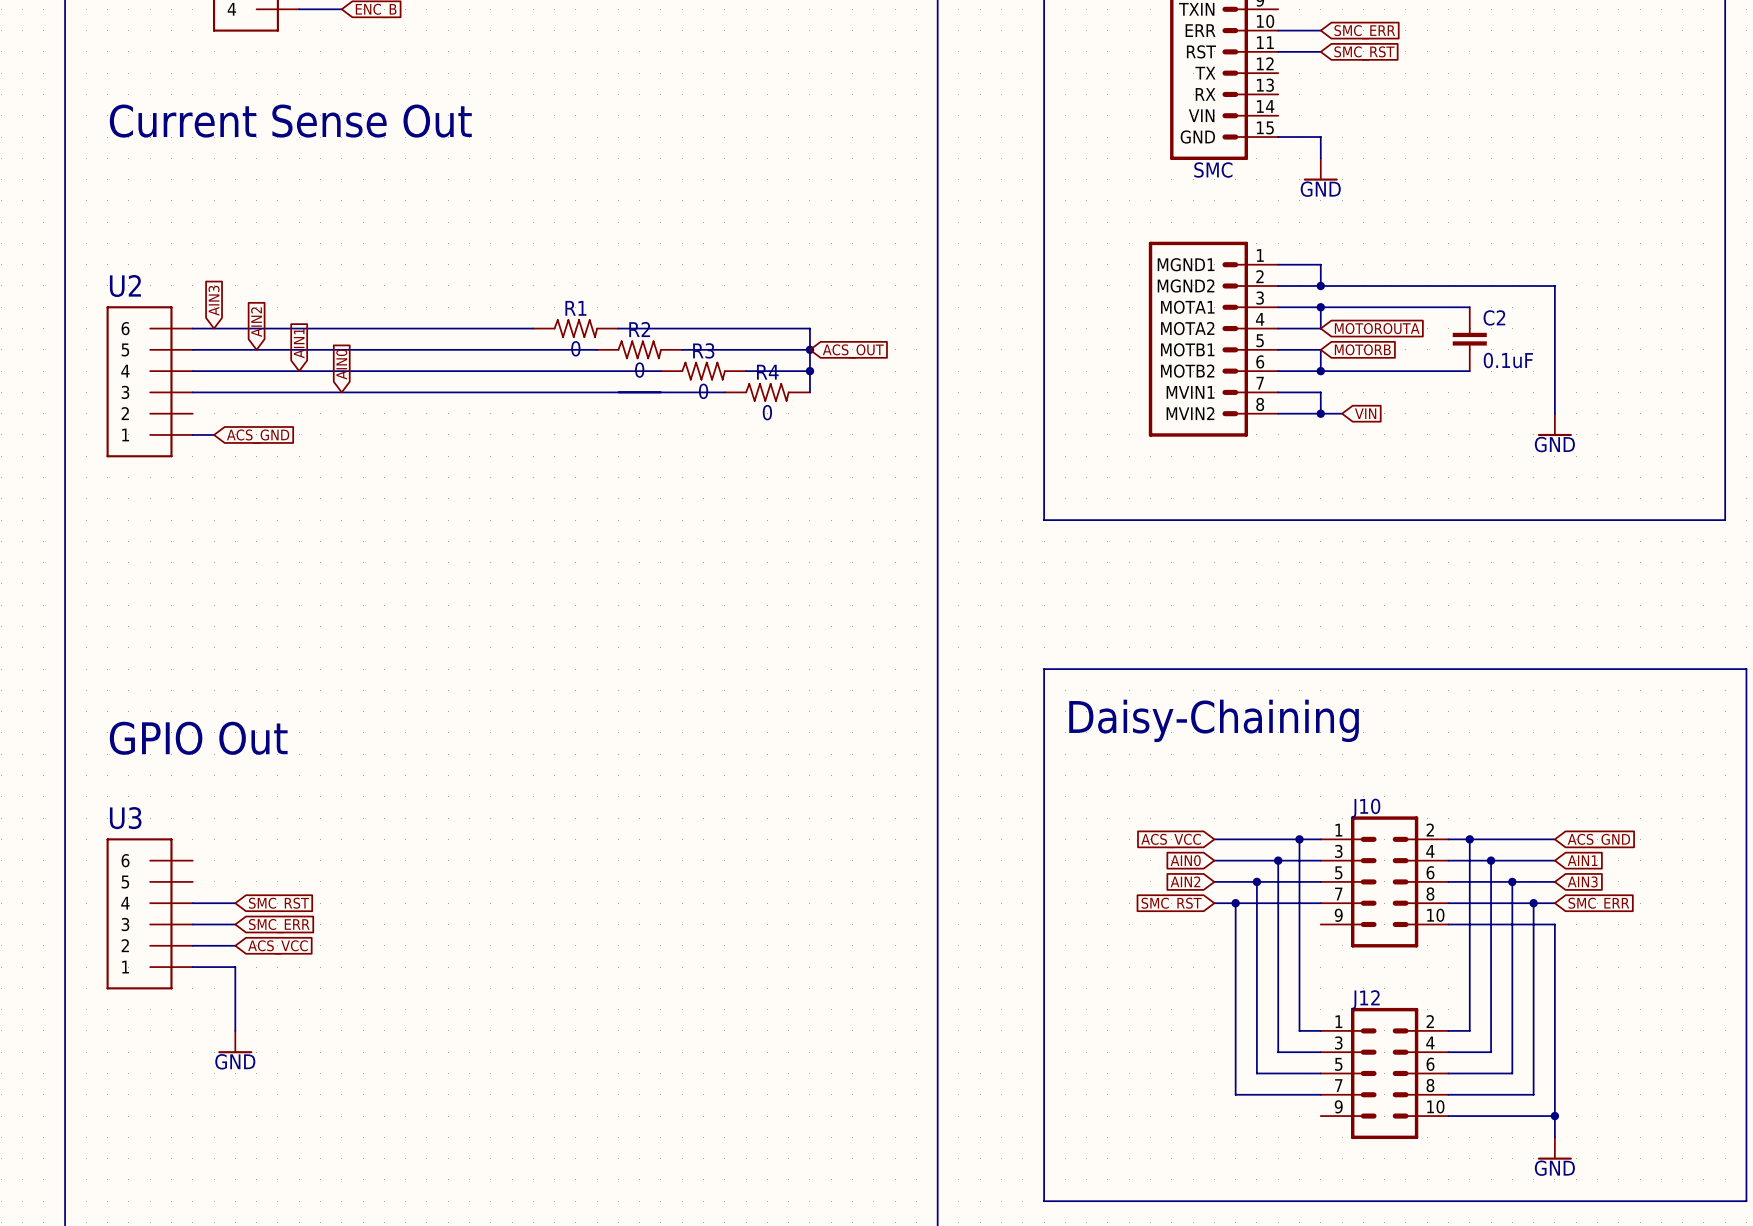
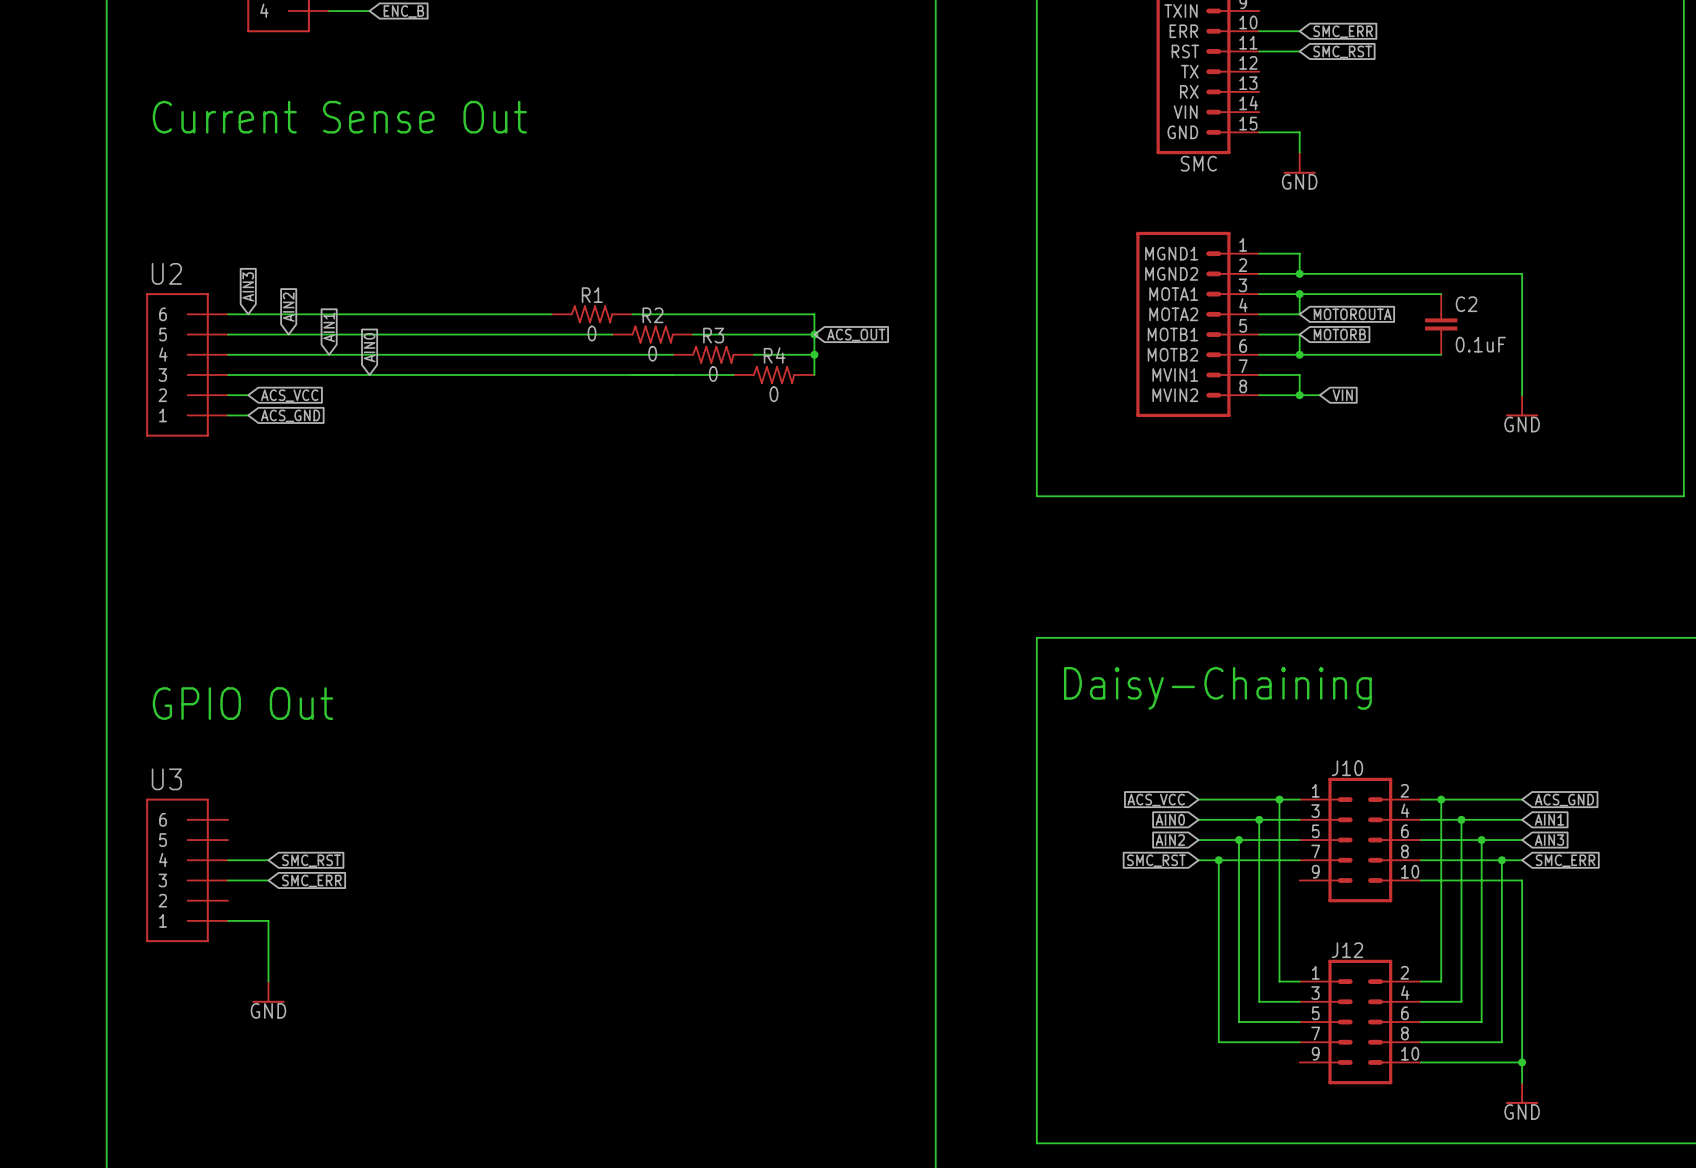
wire: none -> (228, 395) (248, 395)
global label: none -> ACS_VCC (289, 395)
wire: (192, 945) (235, 945) -> none
global label: ACS_VCC (277, 947) -> none

